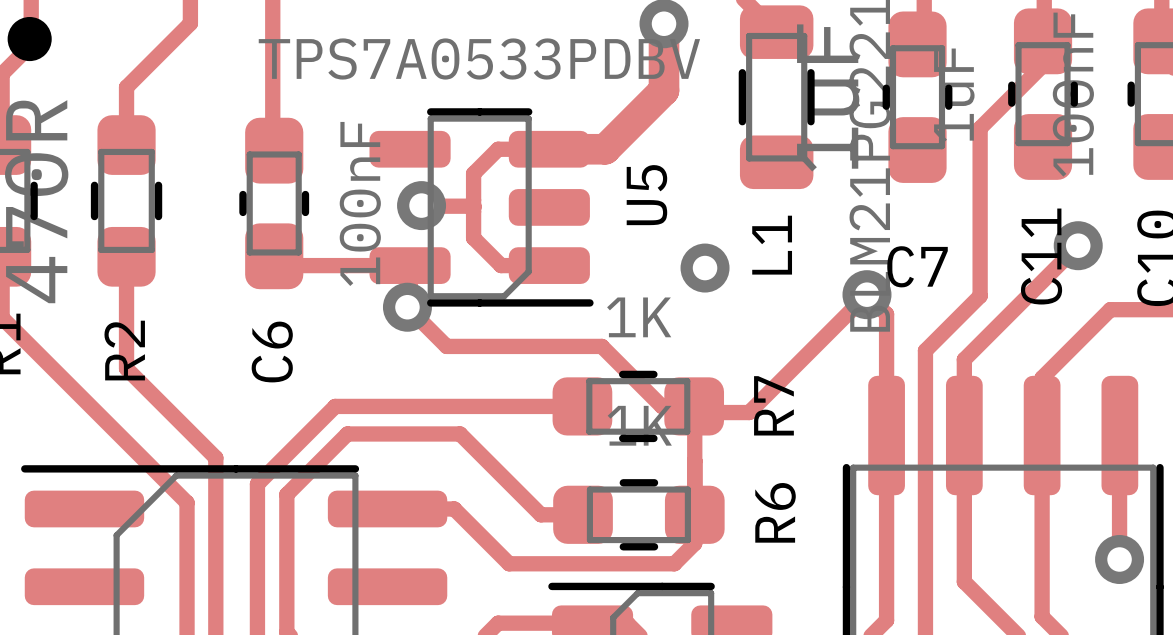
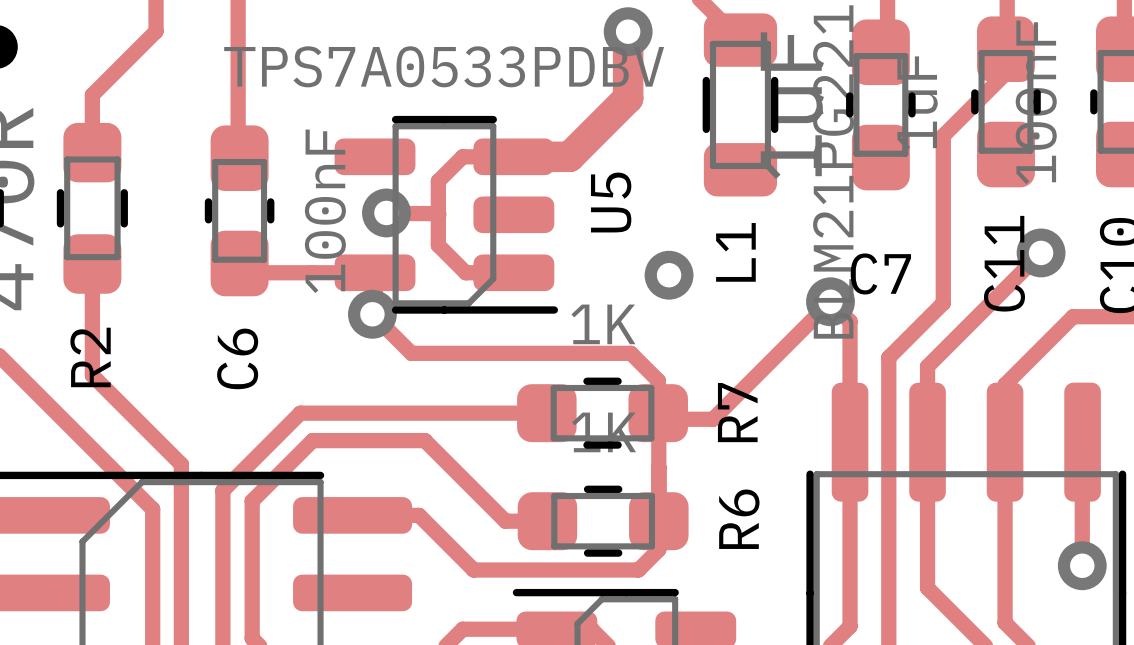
track: (601, 346) (661, 406) (694, 406) -> (566, 353) (630, 353) (658, 380) (658, 413)

